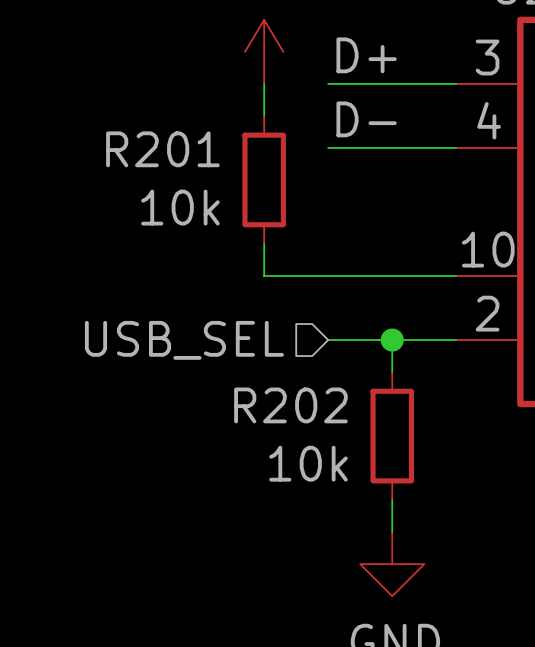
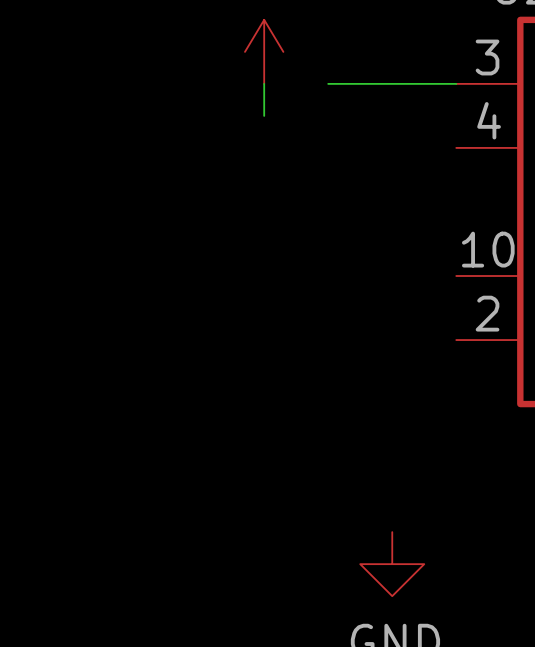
label: D+ (366, 55) -> none
label: D- (366, 119) -> none
wire: (328, 147) (456, 147) -> none
R201: 10k (264, 179) -> none
wire: (264, 243) (264, 276) (456, 276) -> none
hierarchical label: USB_SEL (184, 340) -> none
wire: (328, 340) (456, 340) -> none
wire: (392, 340) (392, 372) -> none
junction: (392, 340) -> none
R202: 10k (392, 436) -> none
wire: (392, 500) (392, 532) -> none

